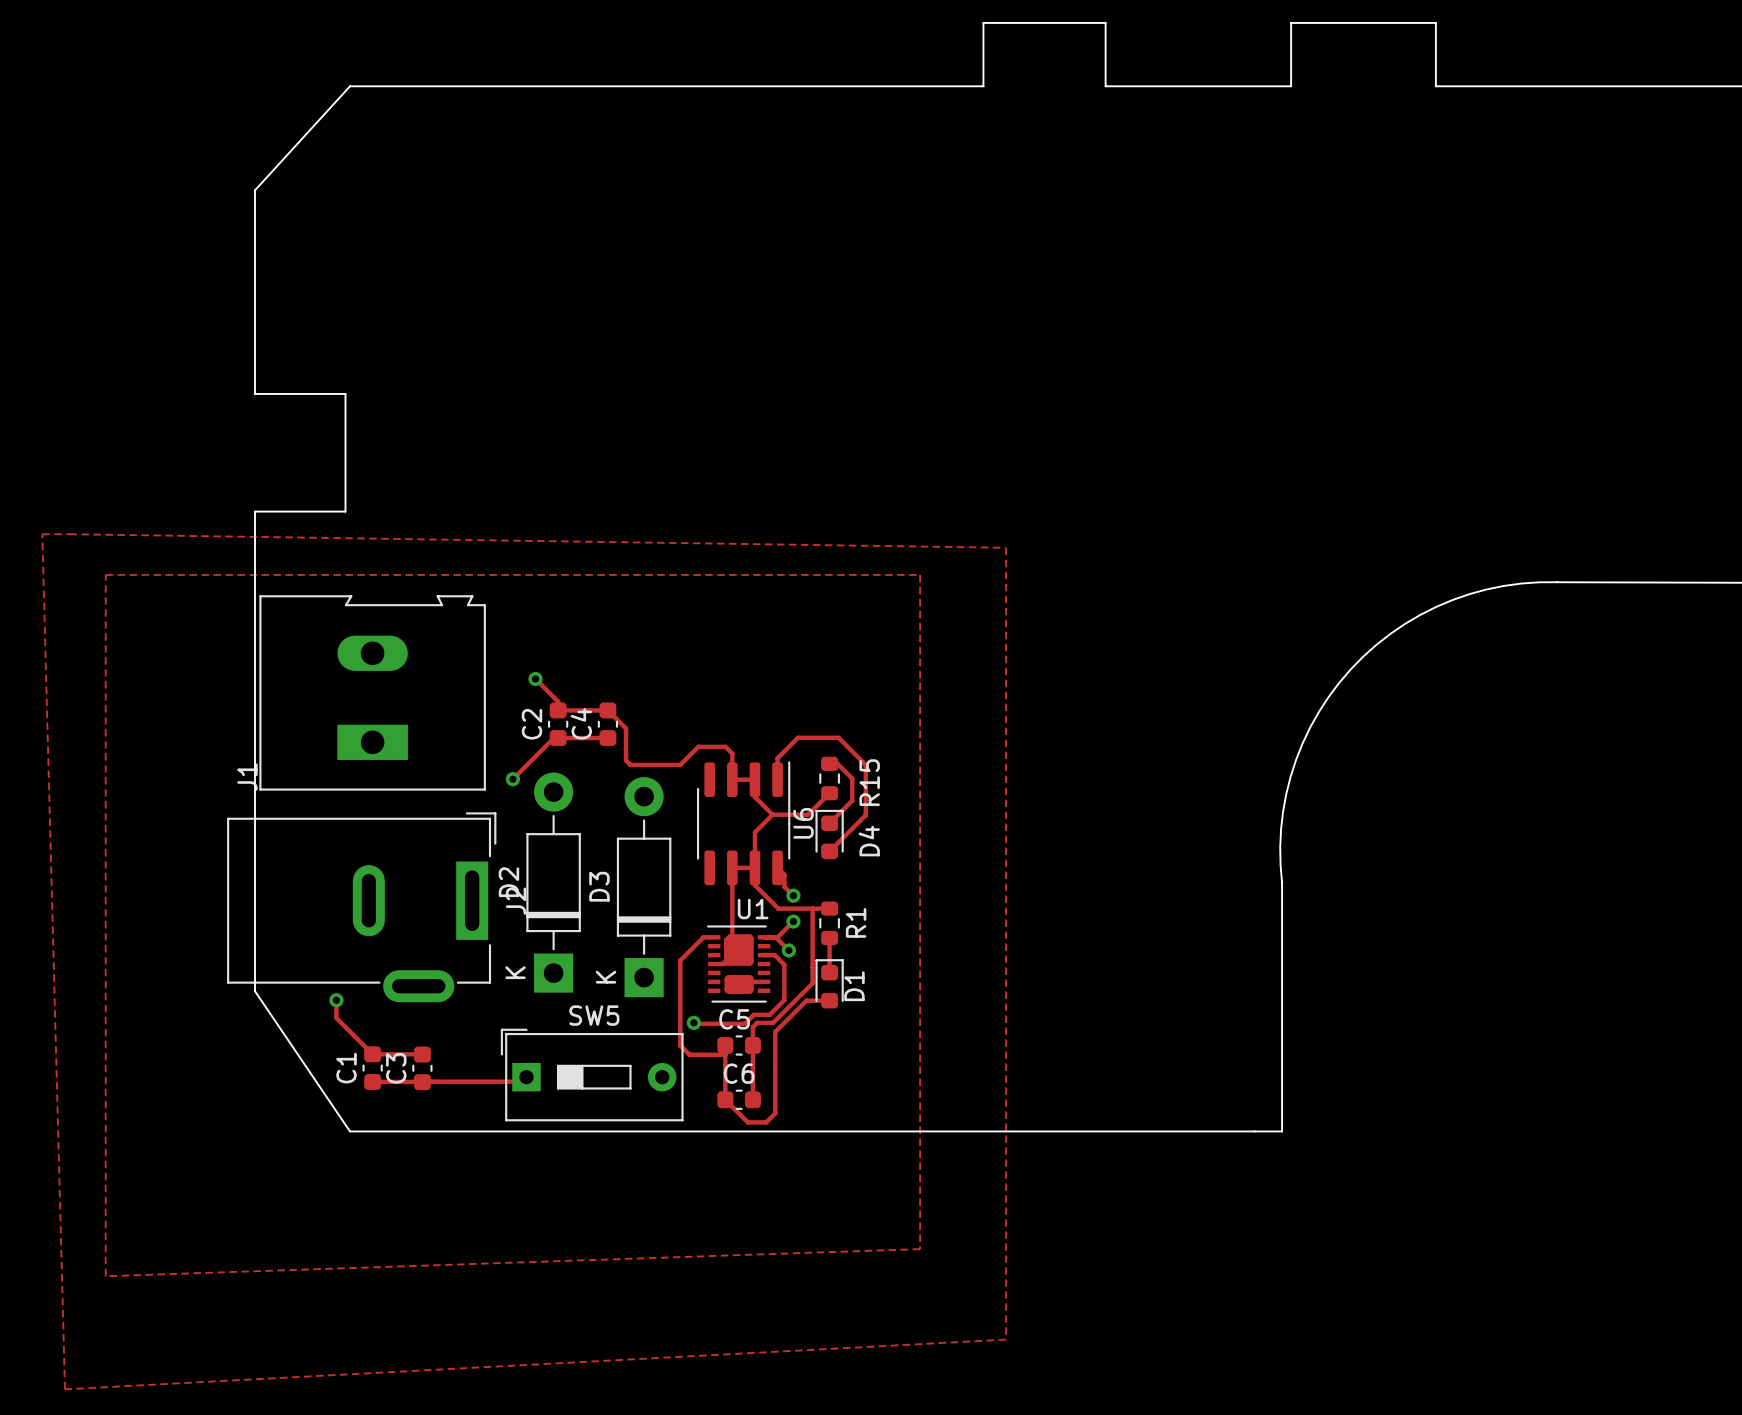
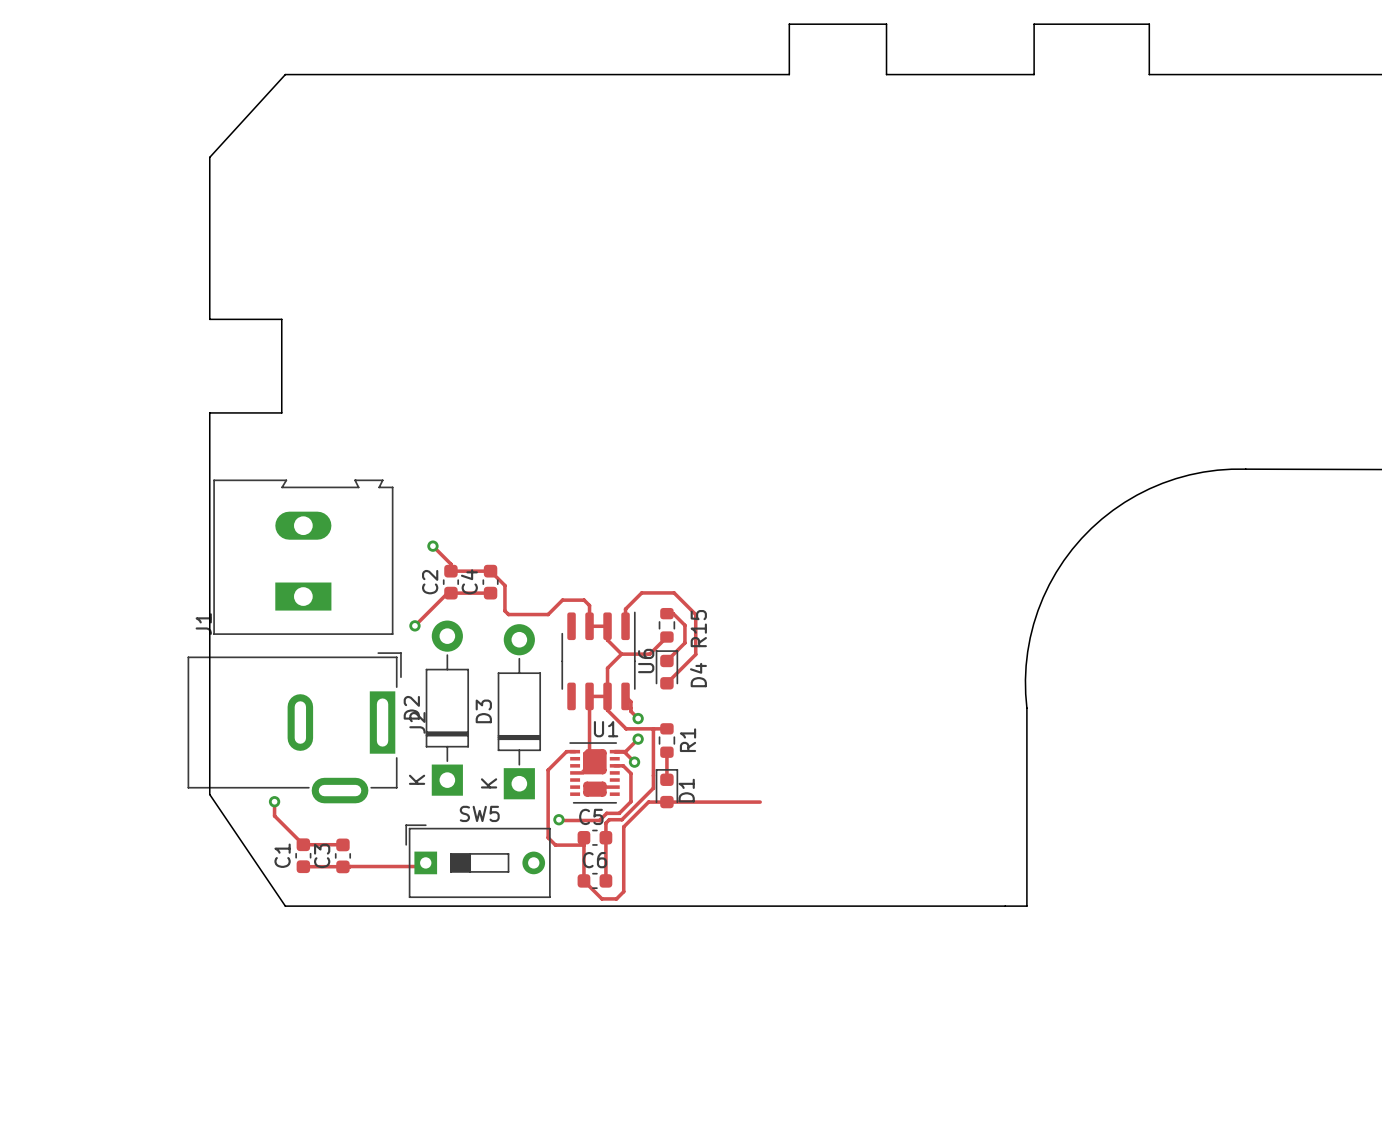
zone outline: (42, 534) (64, 1389) (1006, 1339) (1006, 547) (42, 534) -> none
zone outline: (105, 574) (105, 1276) (920, 1249) (920, 574) (105, 574) -> none
track: none -> (666, 802) (760, 802)

